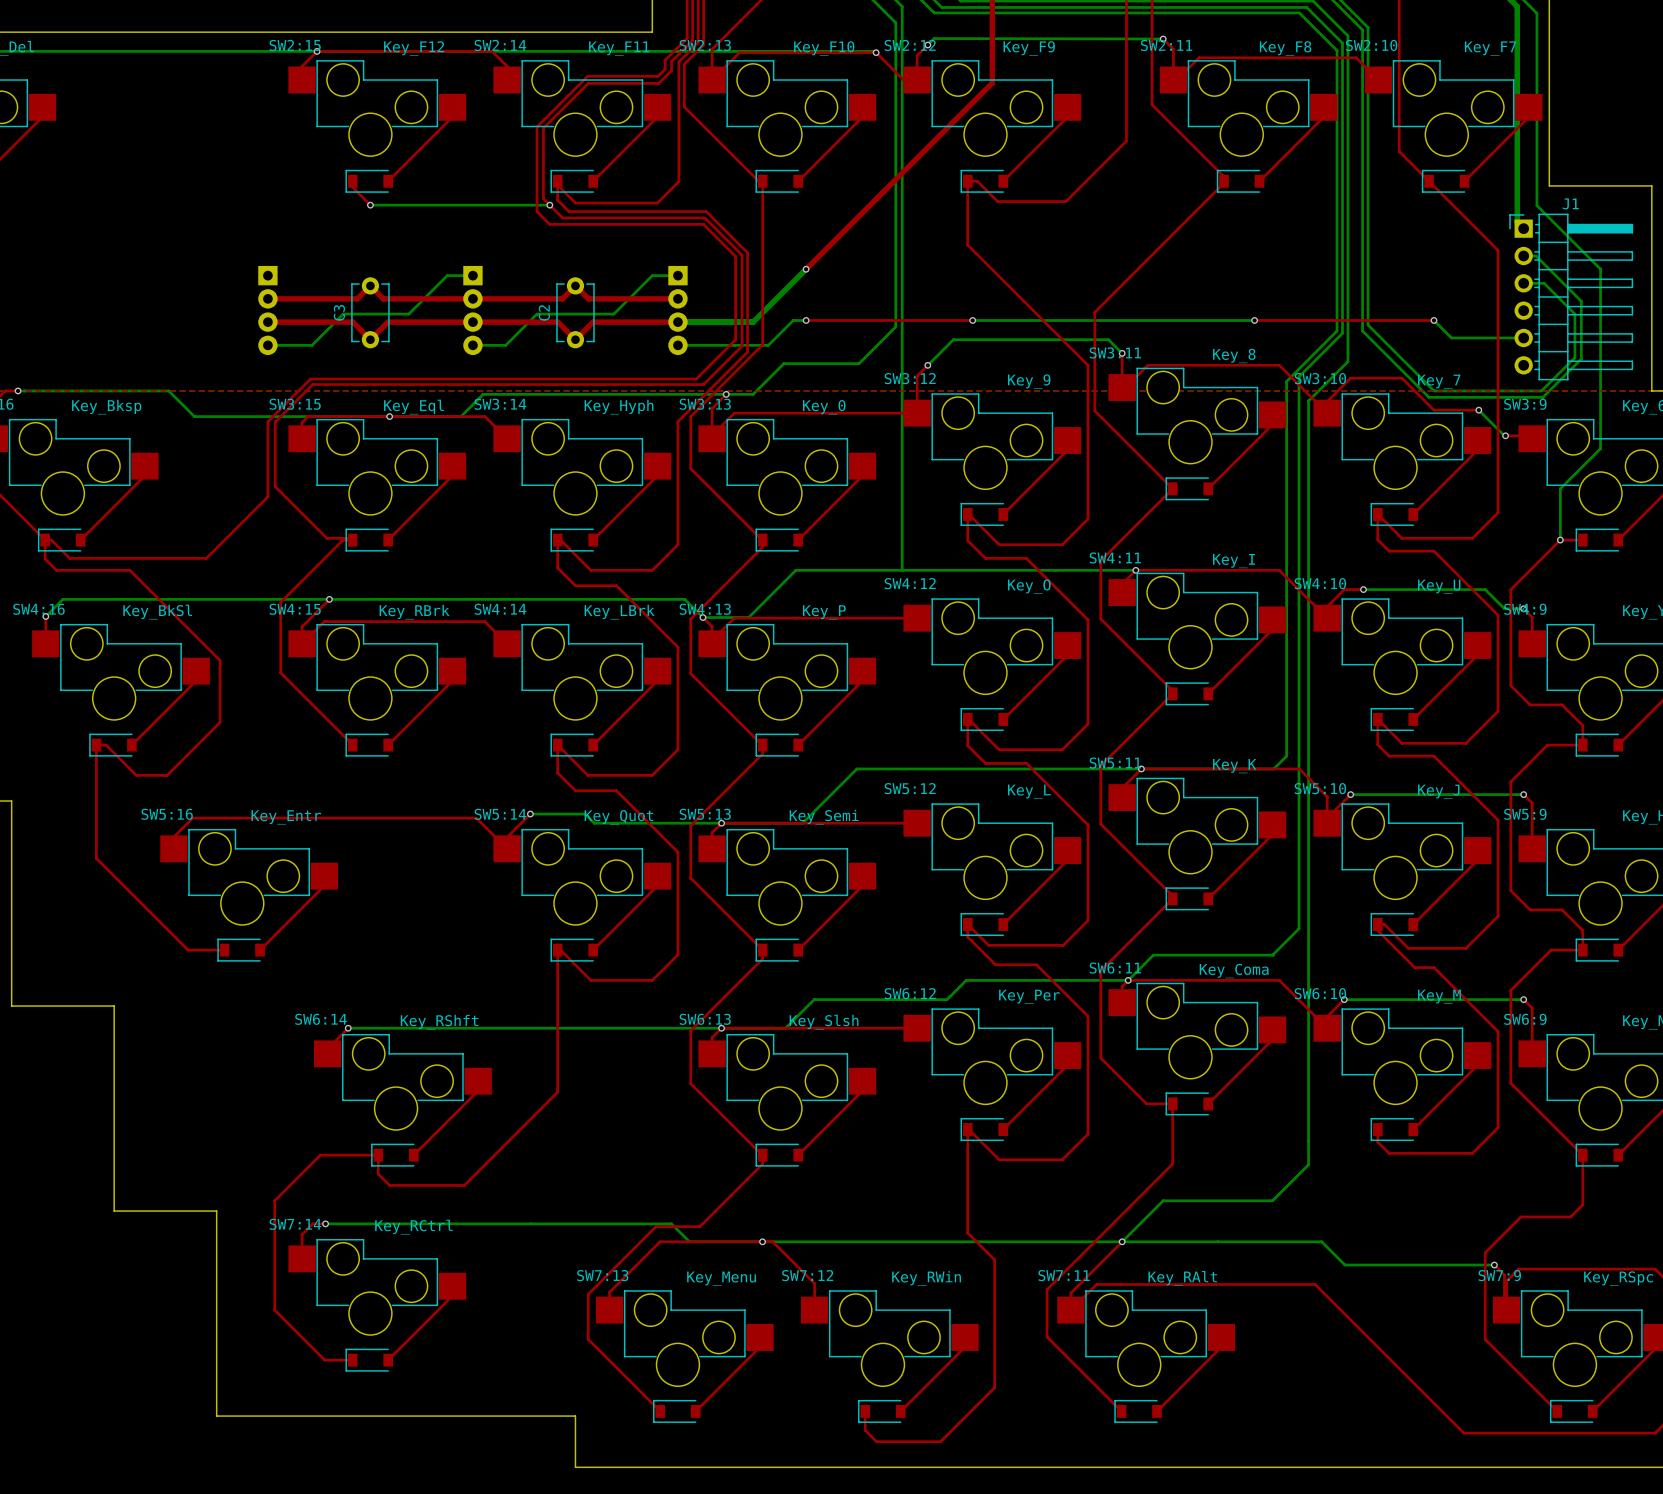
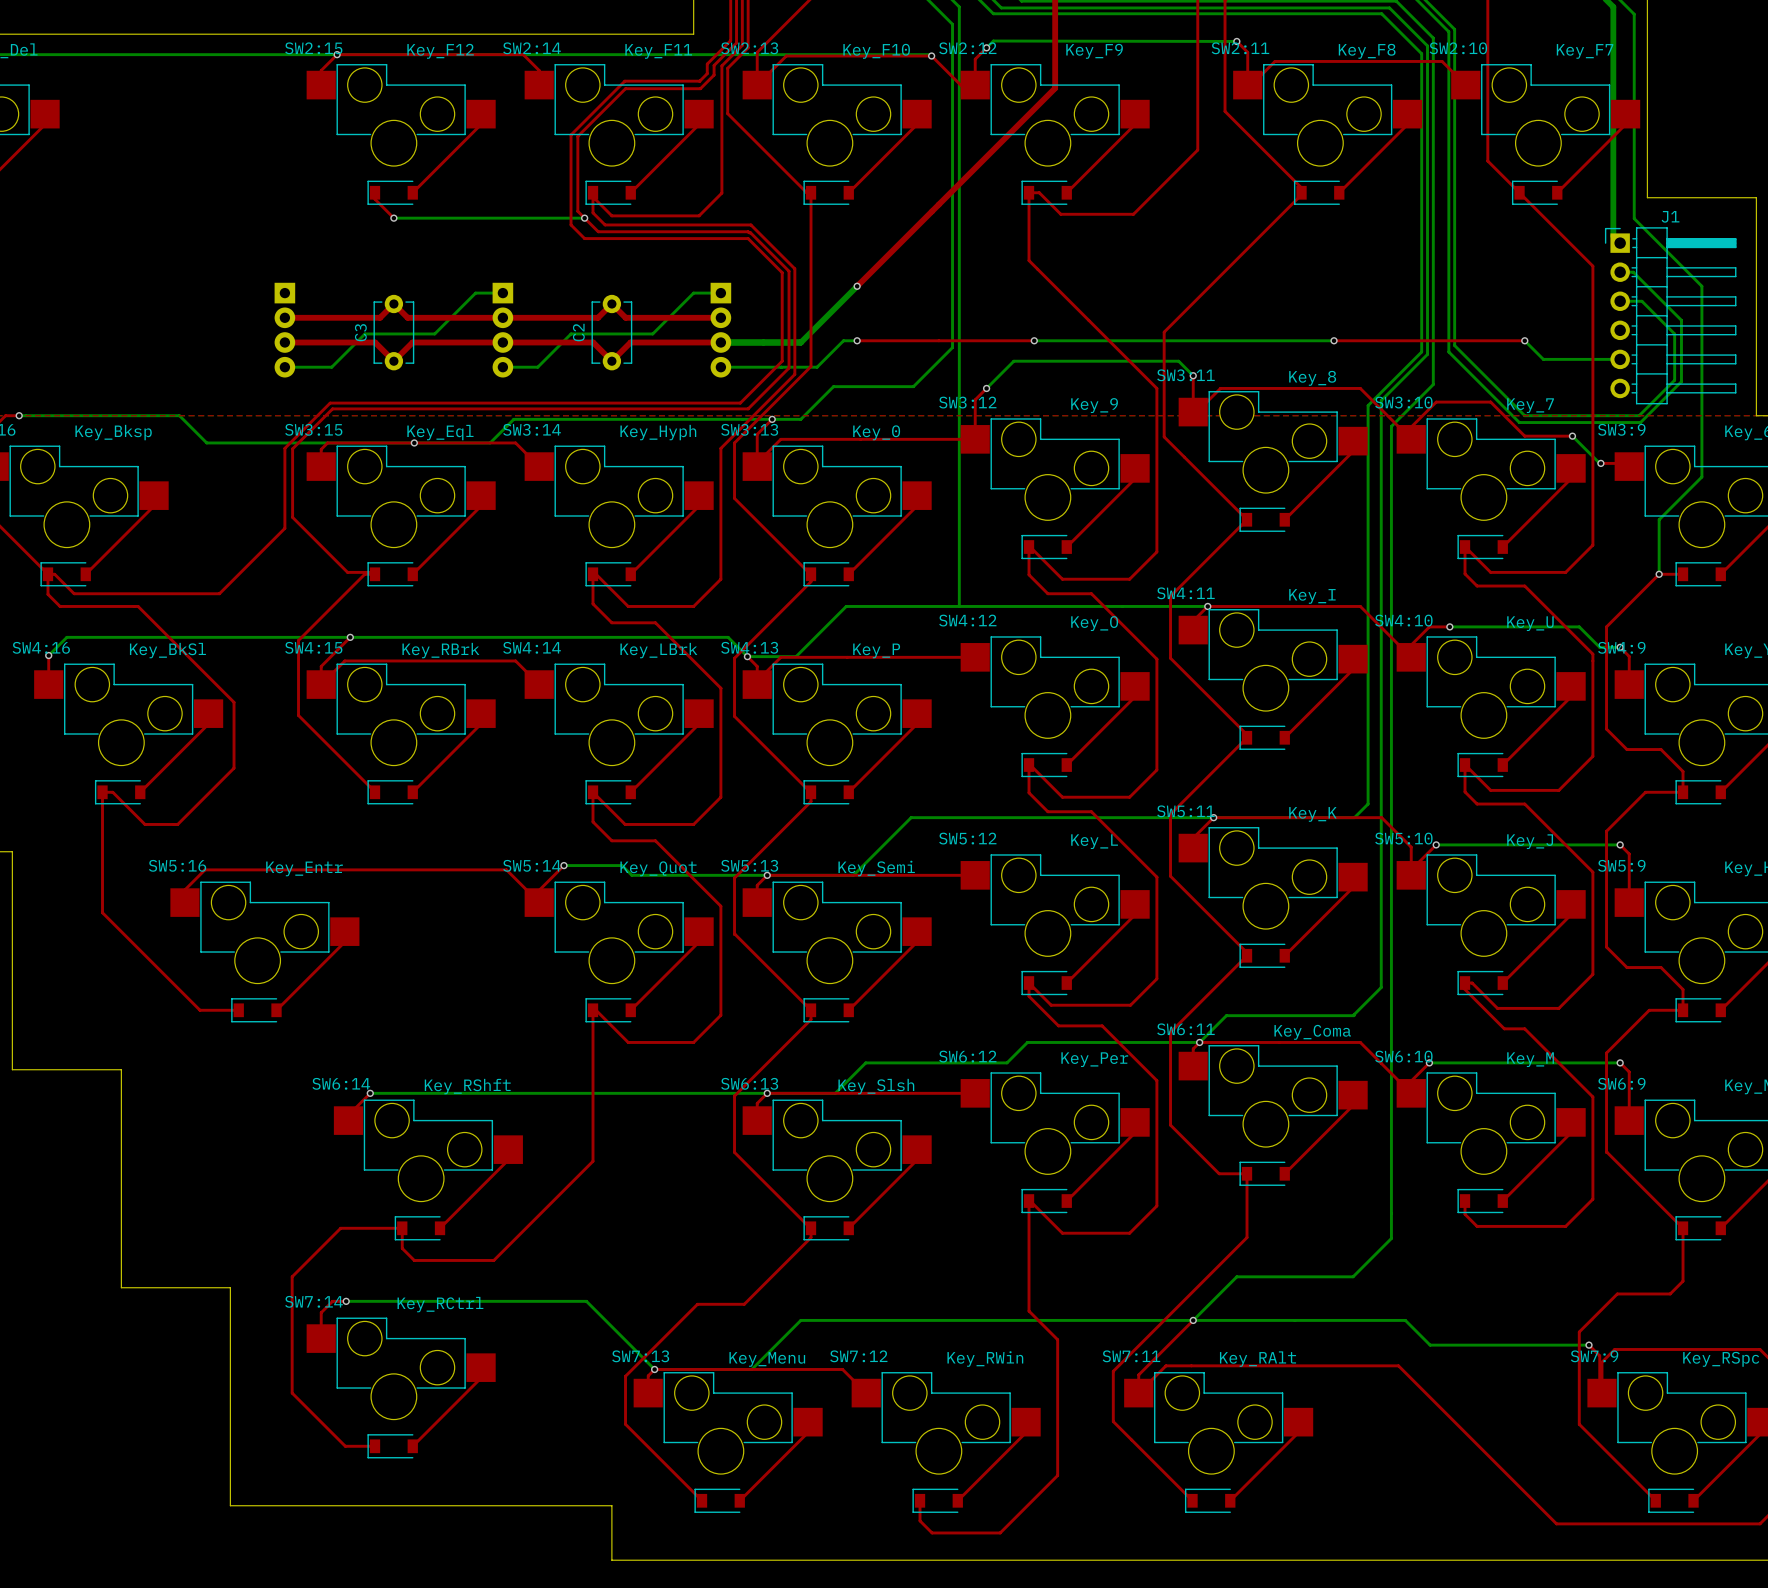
bottom track: (551, 1223) (671, 1223) (689, 1241) (753, 1241) -> (586, 1301) (654, 1369) (751, 1369) (800, 1320)
via: (762, 1241) -> none
via: none -> (654, 1369)
top track: (609, 1293) (660, 1241) (772, 1241) (814, 1283) (814, 1310) -> (648, 1375) (654, 1369) (842, 1369) (866, 1393)

